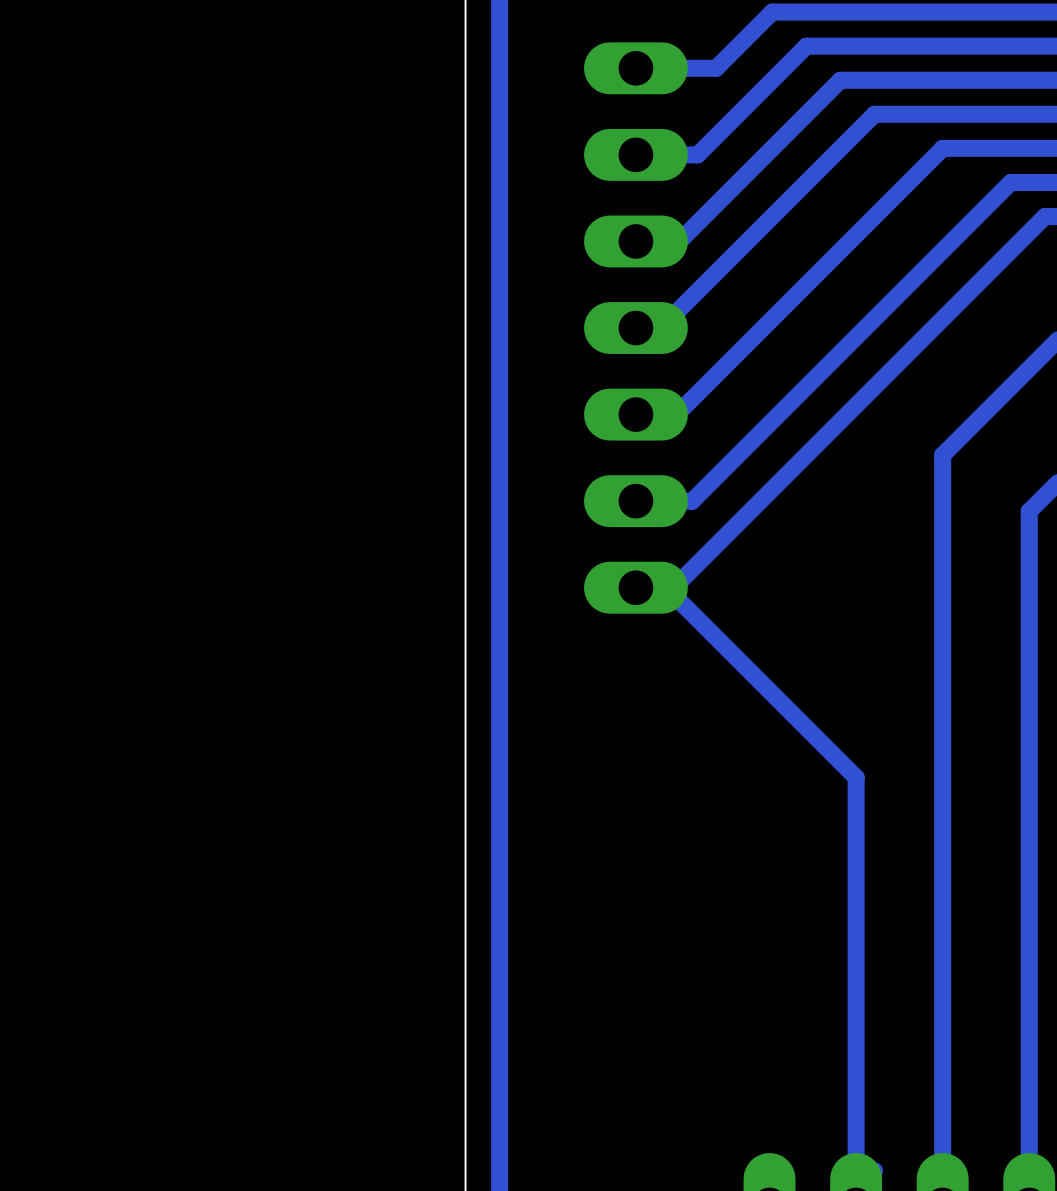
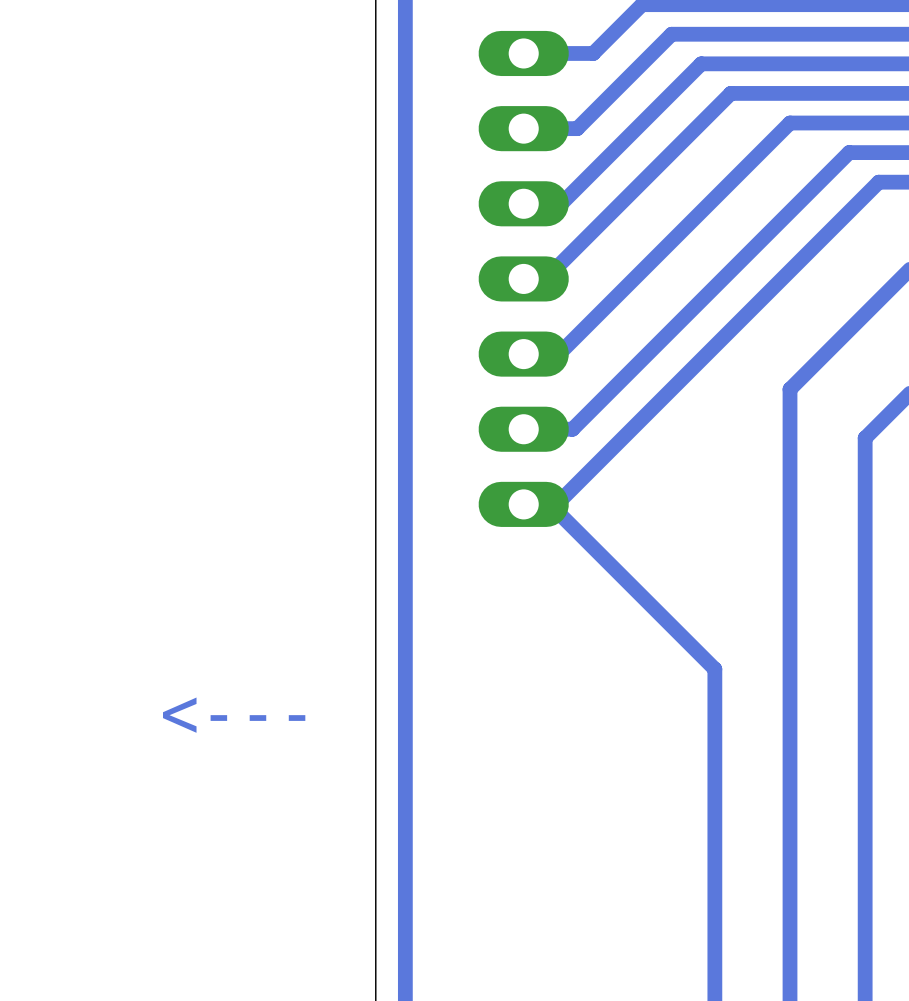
text: none -> <--- (234, 715)

